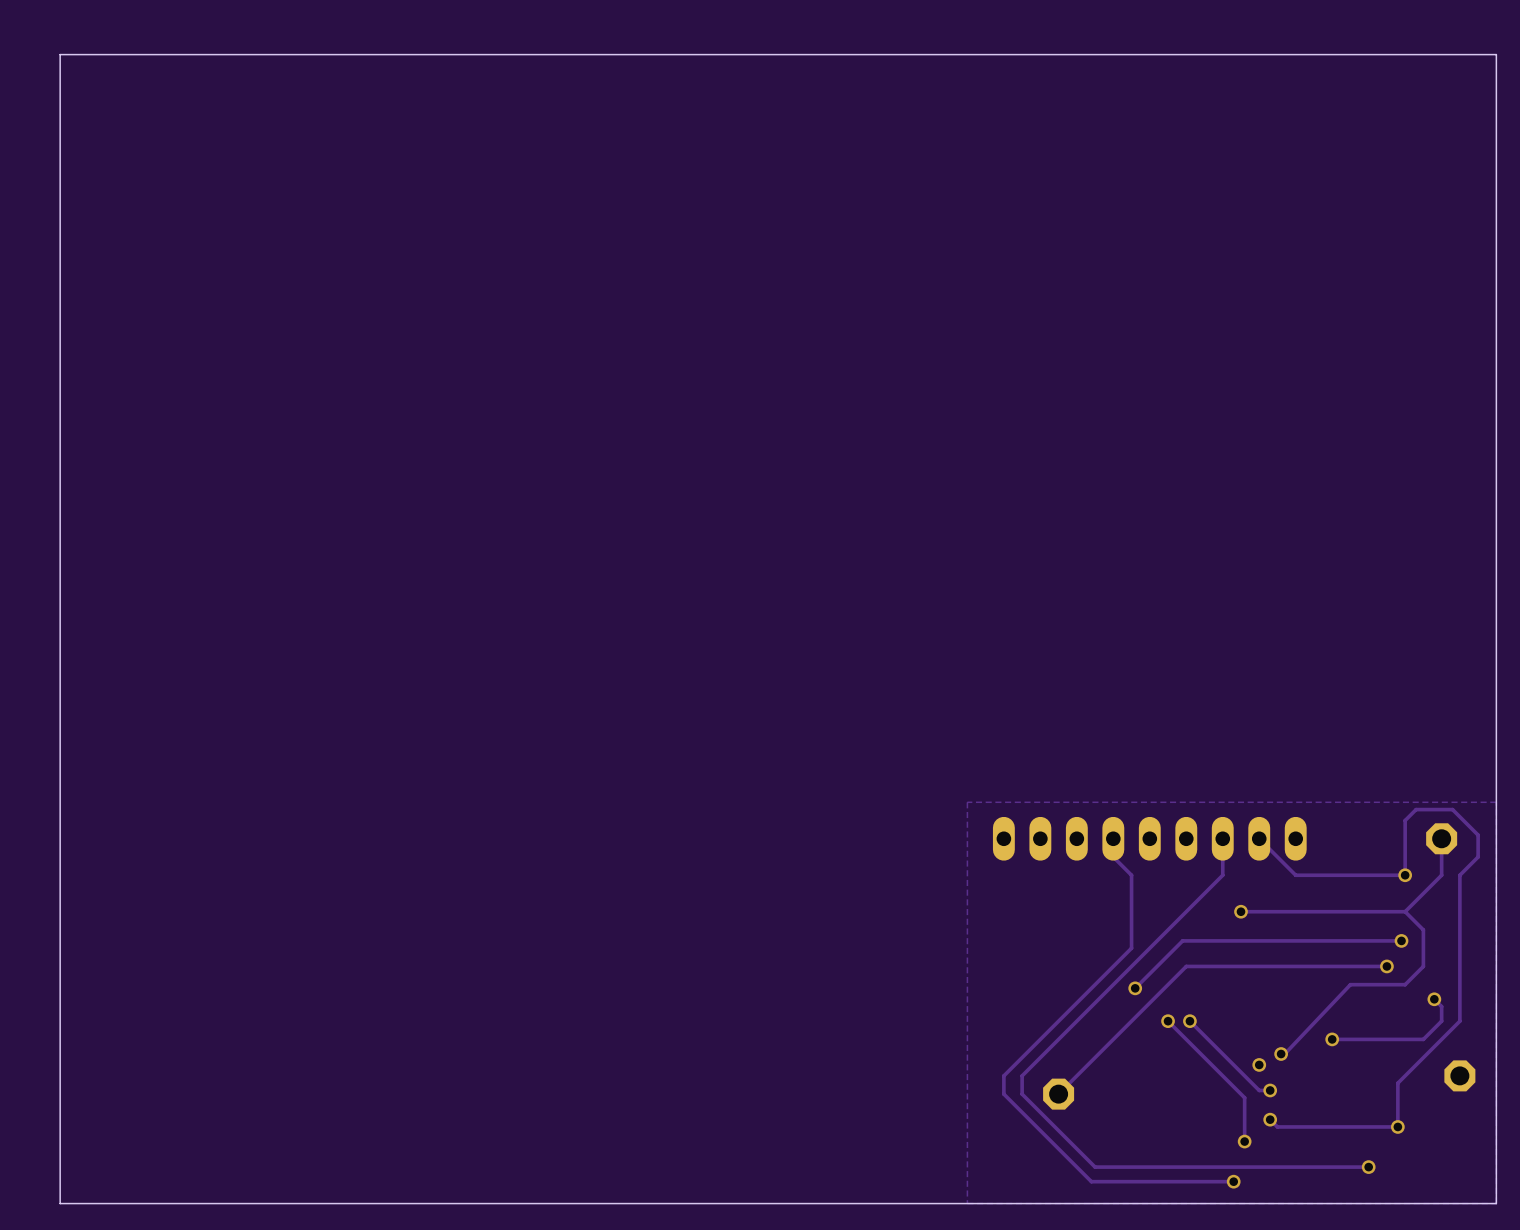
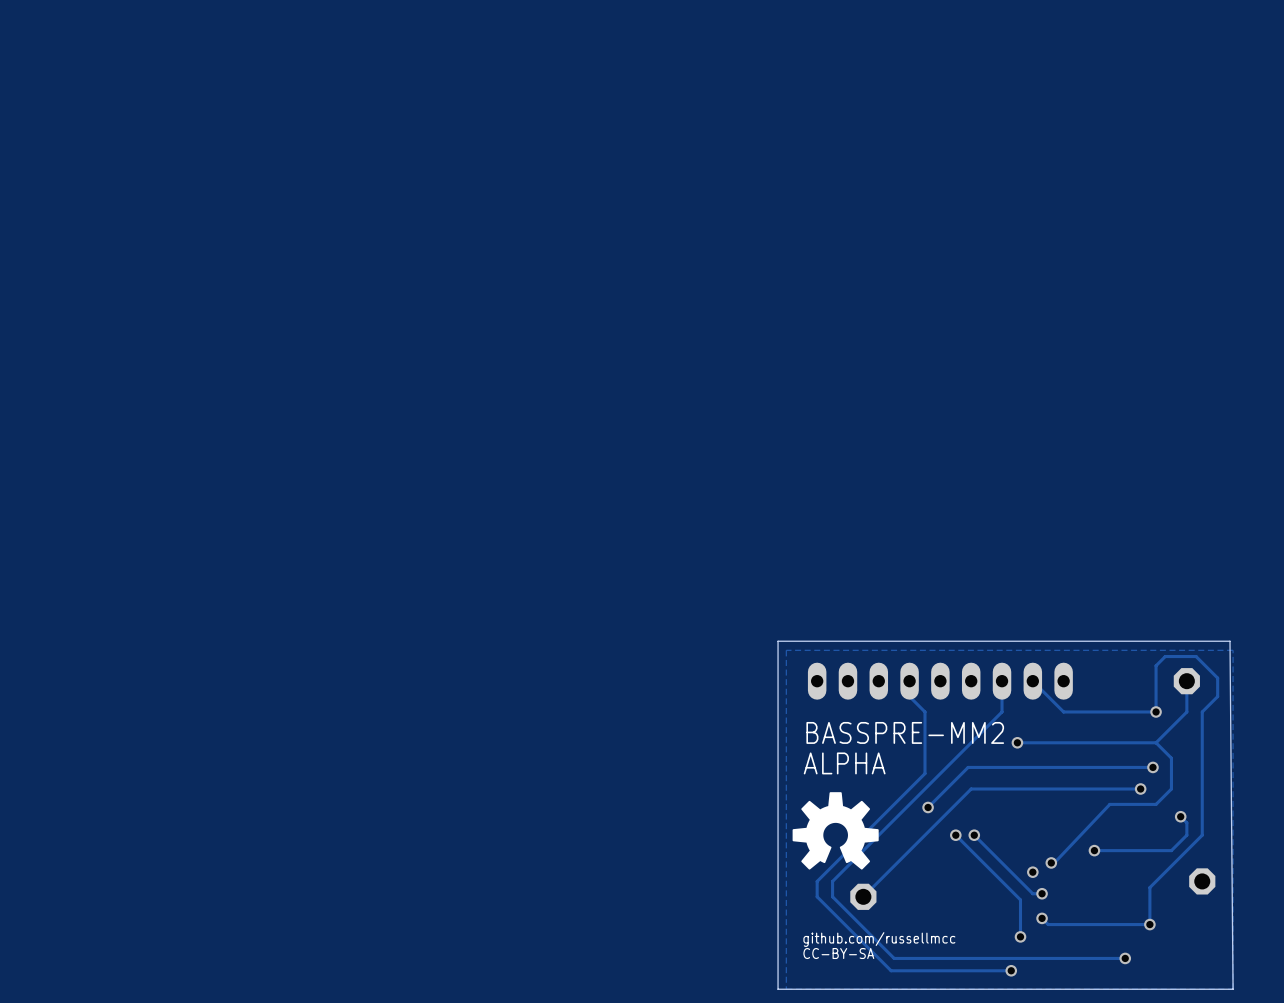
text: none -> BASSPRE-MM2 (905, 732)
text: none -> ALPHA (844, 763)
drawing: none -> [792, 792, 879, 870]
text: none -> github.com/russellmcc (879, 939)
text: none -> CC-BY-SA (838, 953)
board edge: (1496, 1203) (1496, 54) (60, 54) (60, 1203) (957, 1203) -> (1233, 989) (1229, 641) (778, 641) (778, 989)

